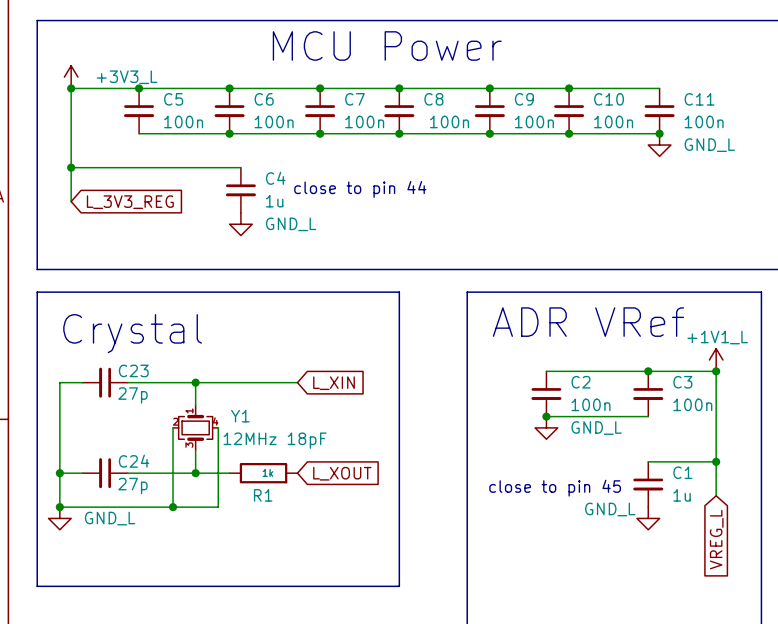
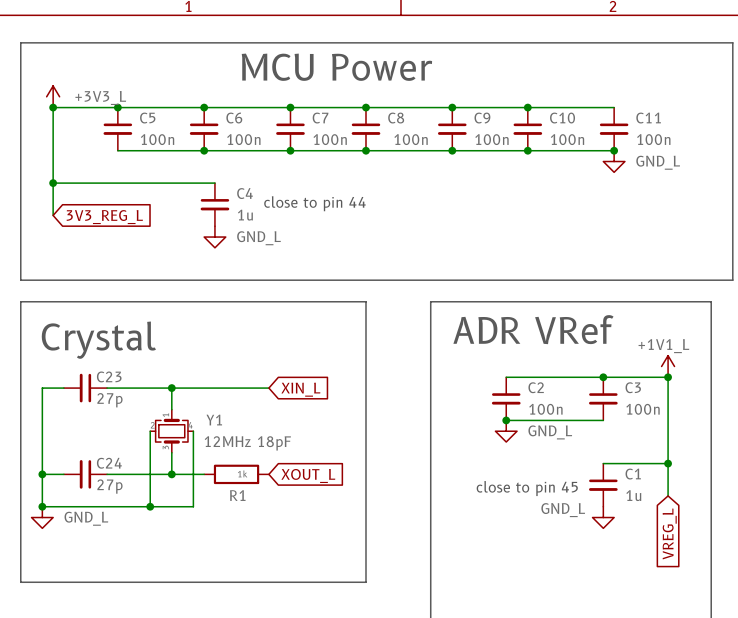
global label: L_3V3_REG (130, 202) -> 3V3_REG_L (104, 217)
global label: L_XIN (334, 383) -> XIN_L (300, 389)
global label: L_XOUT (342, 473) -> XOUT_L (308, 475)

